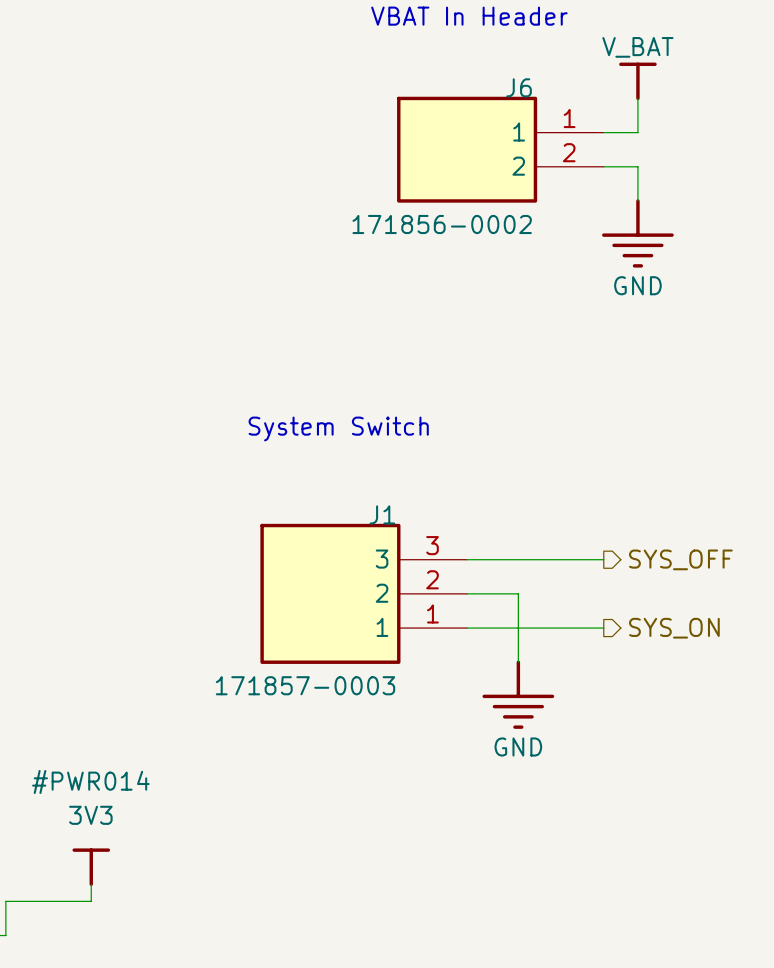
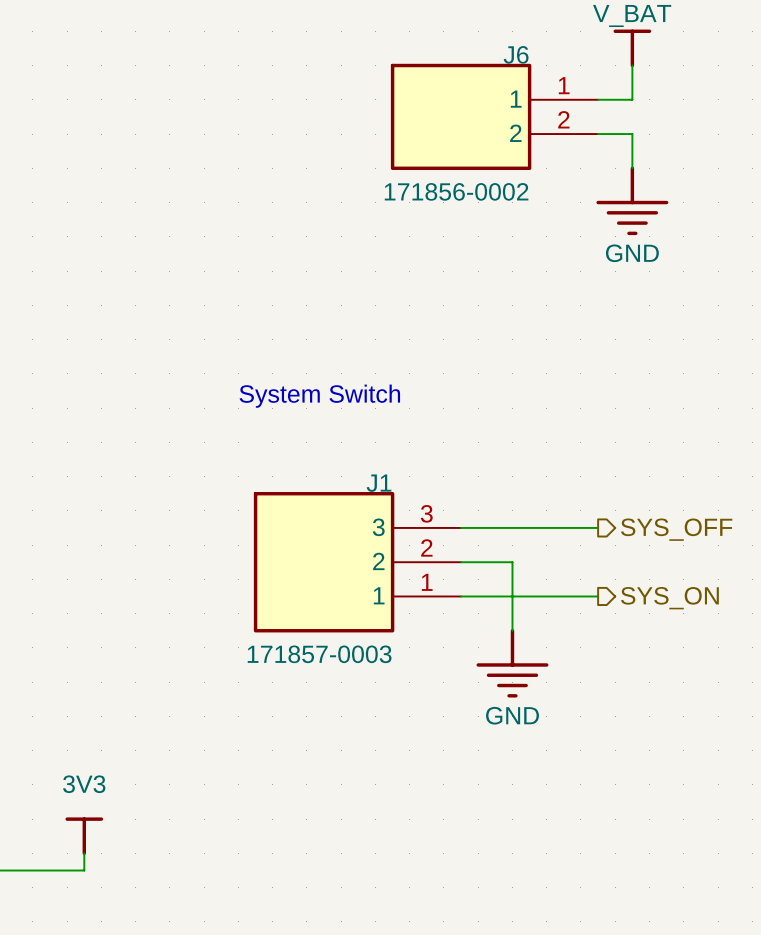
#PWR014 name: #PWR014 (90, 781) -> none

